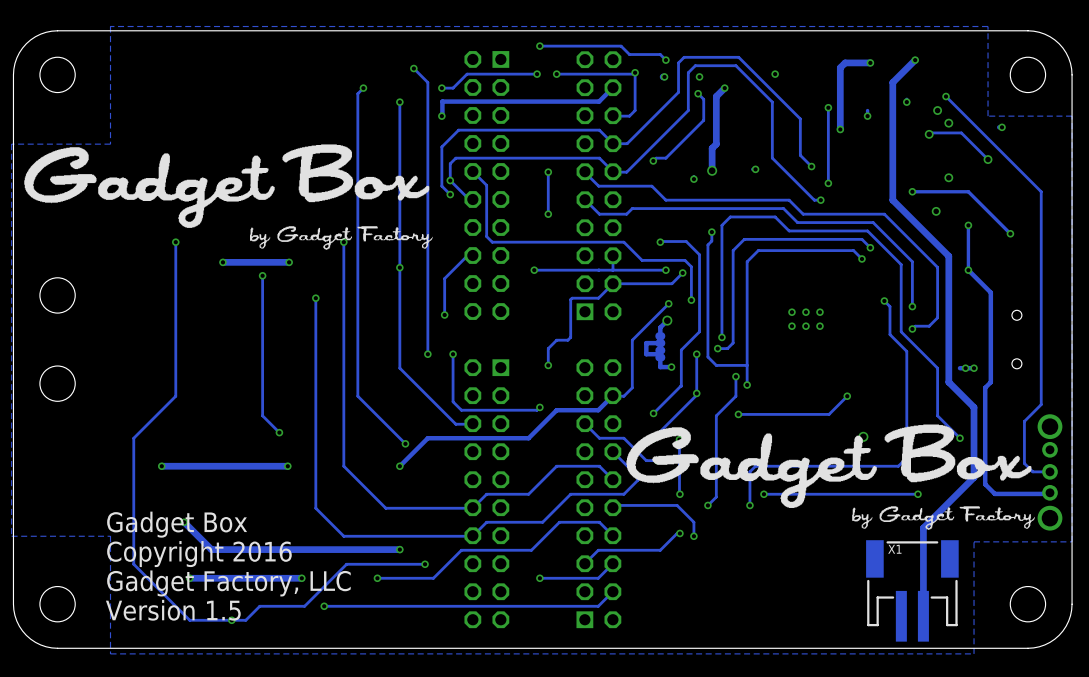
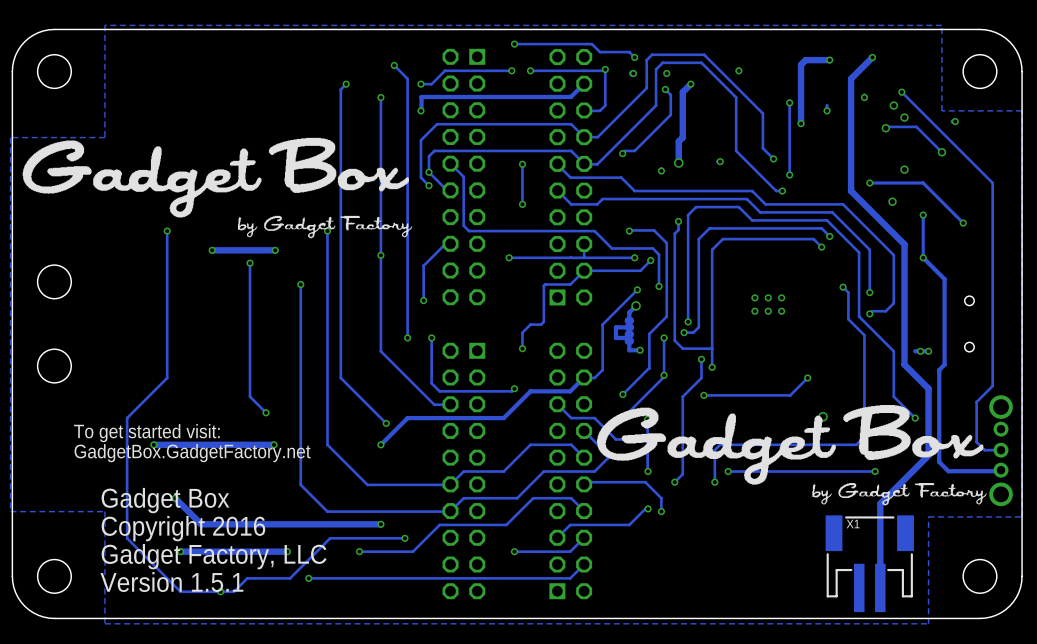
text: none -> To get started visit: (146, 433)
text: none -> GadgetBox.GadgetFactory.net (192, 453)
text: Version 1.5 (173, 610) -> Version 1.5.1 (171, 582)

